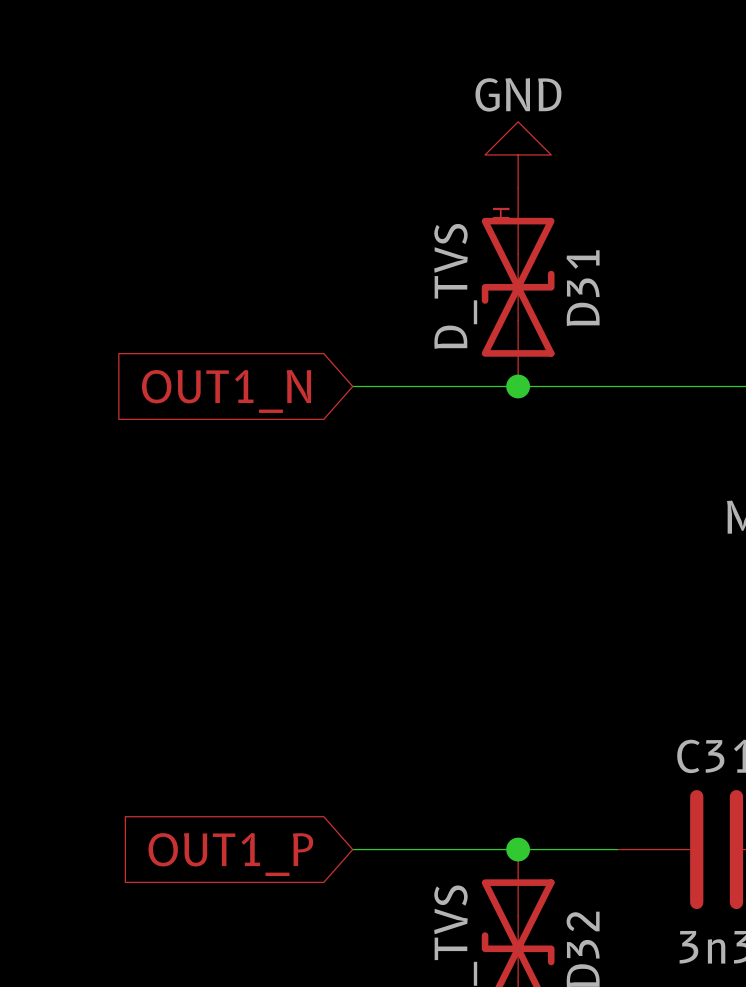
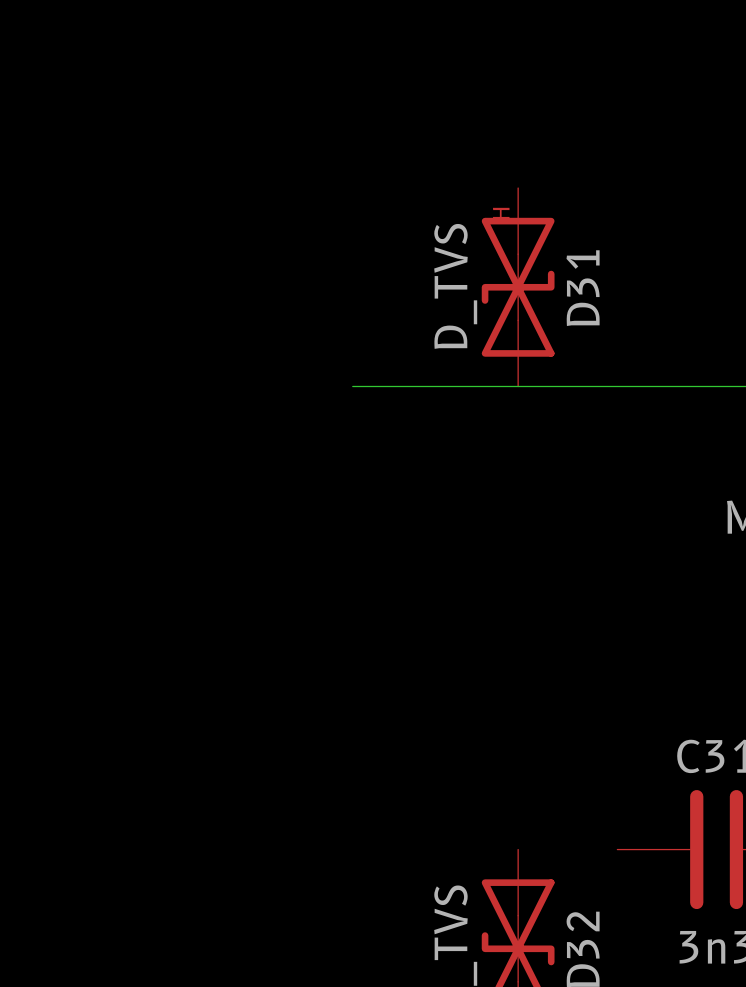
power symbol: GND (518, 154) -> none
junction: (518, 386) -> none
global label: OUT1_N (226, 391) -> none
wire: (352, 849) (617, 849) -> none
junction: (518, 849) -> none
global label: OUT1_P (230, 854) -> none

